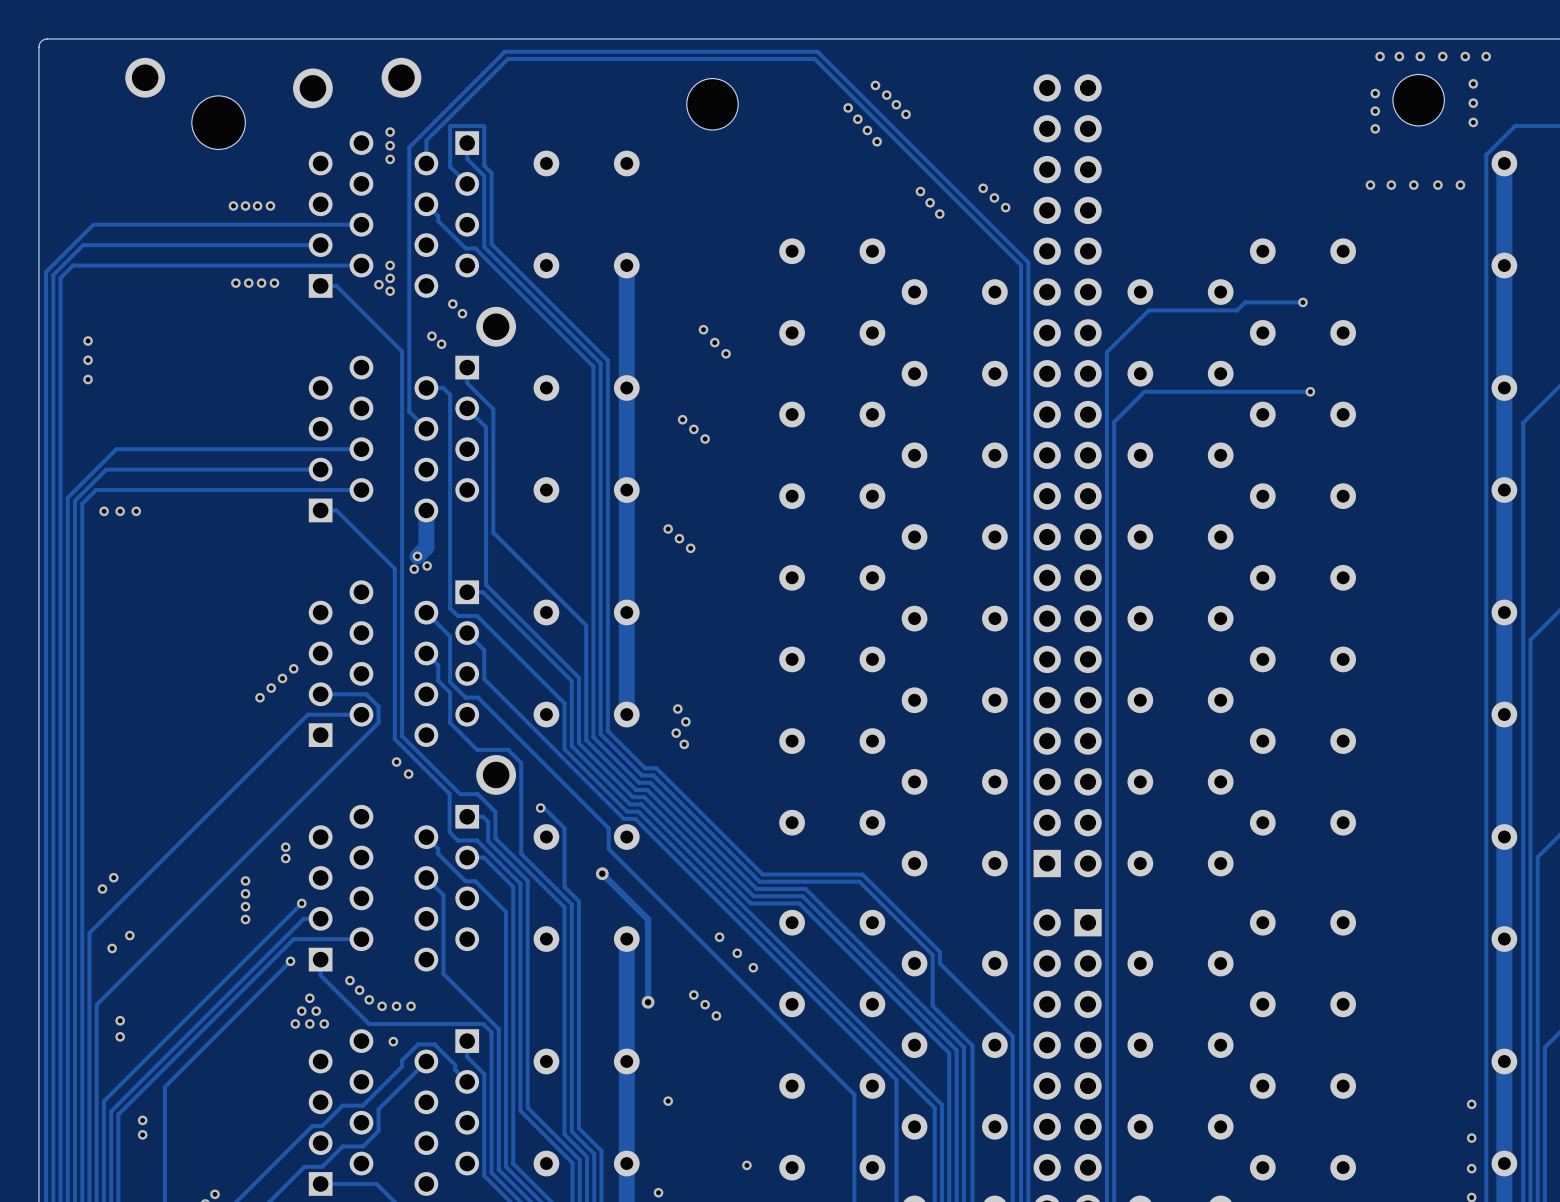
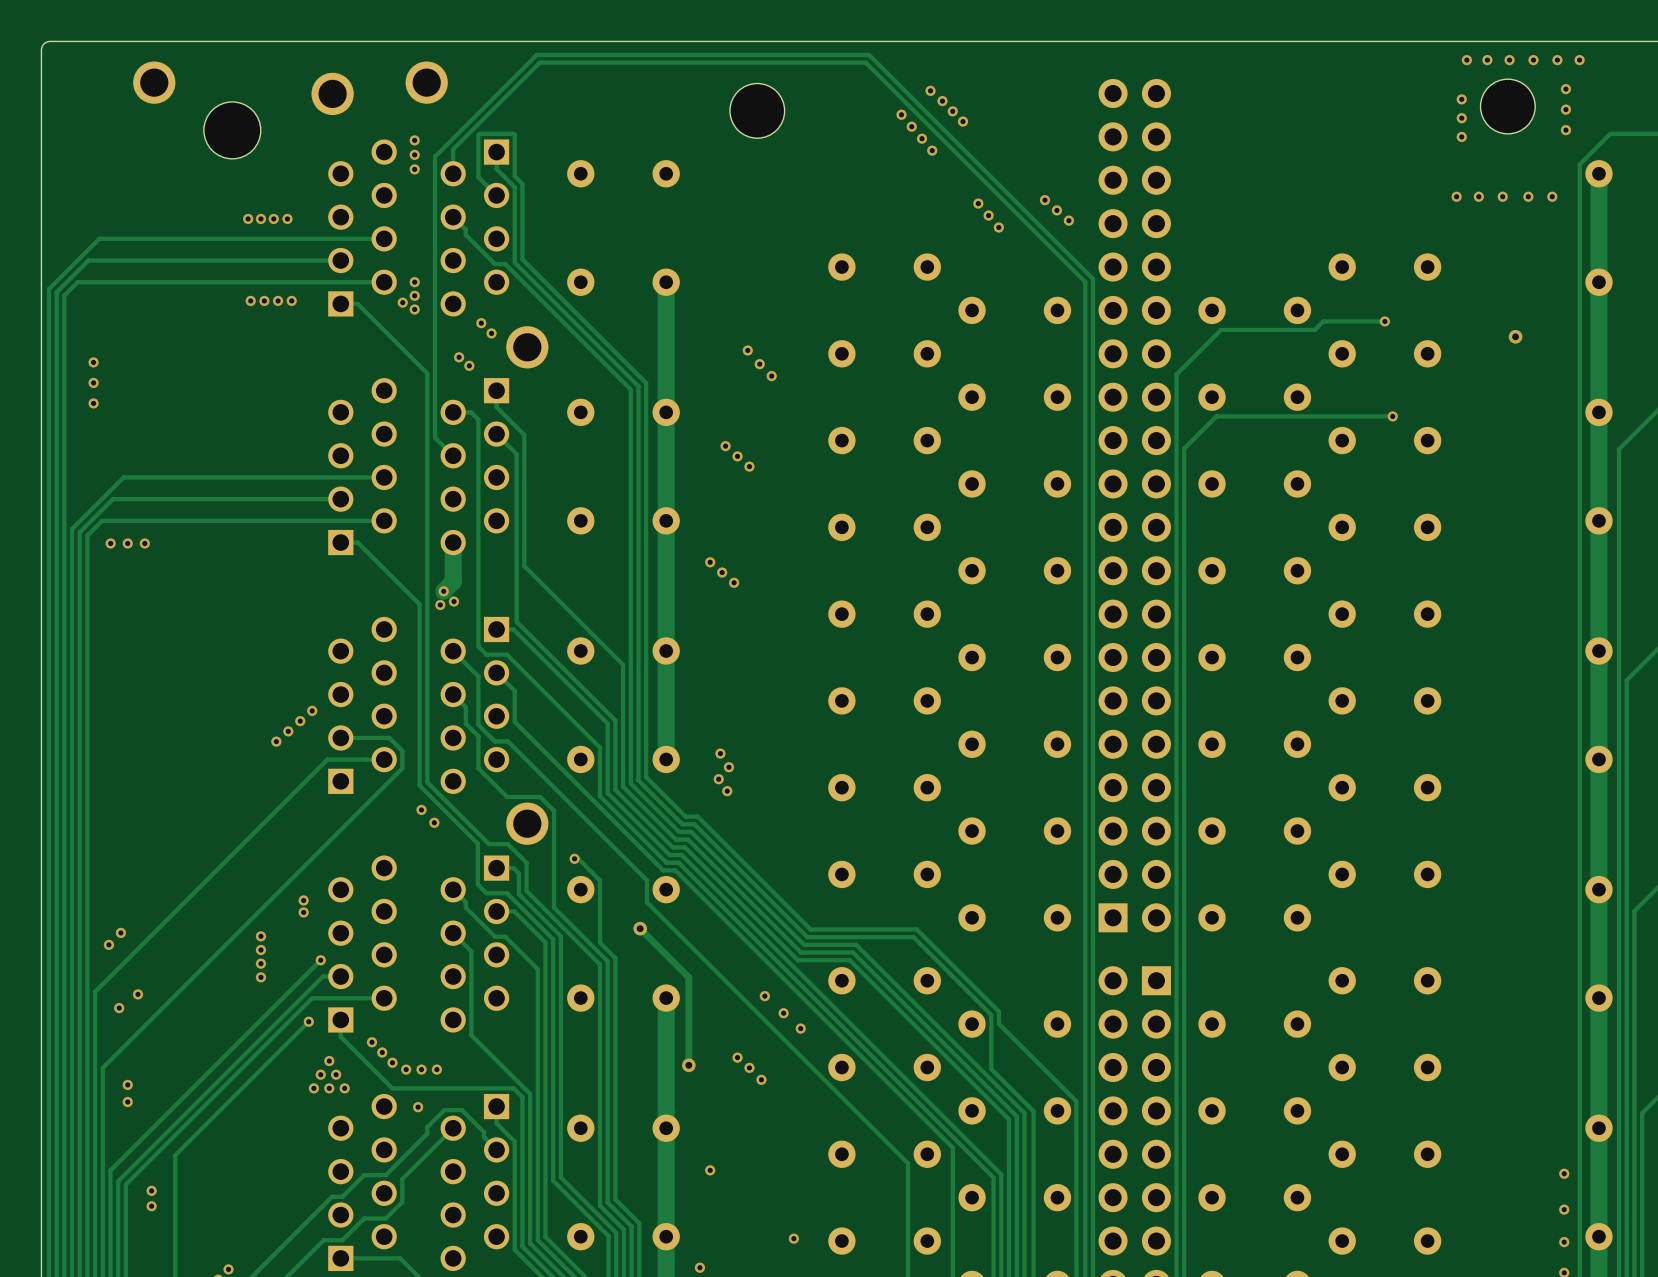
via: none -> (1515, 336)

